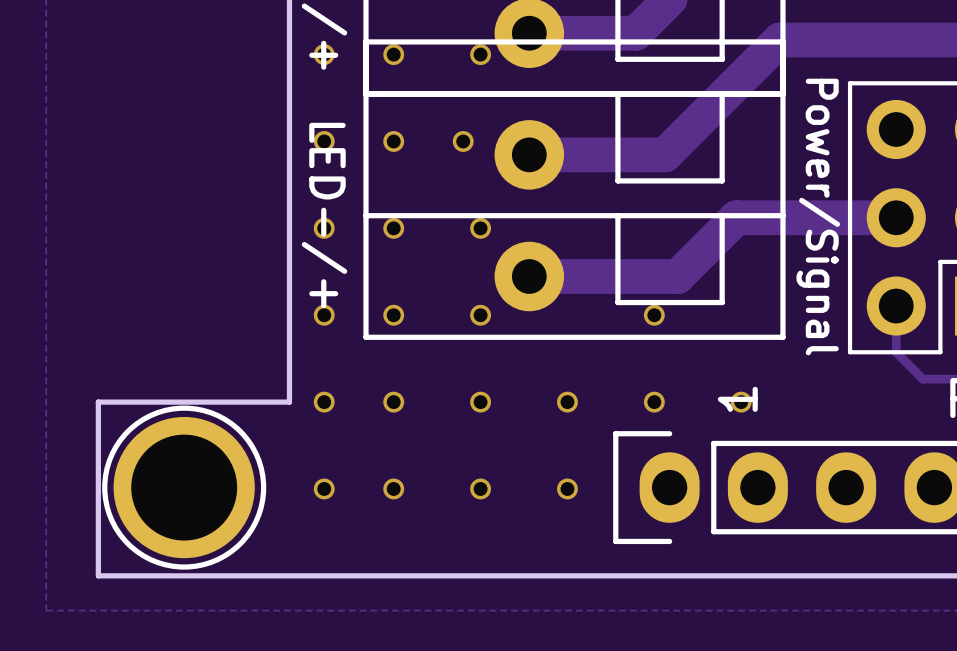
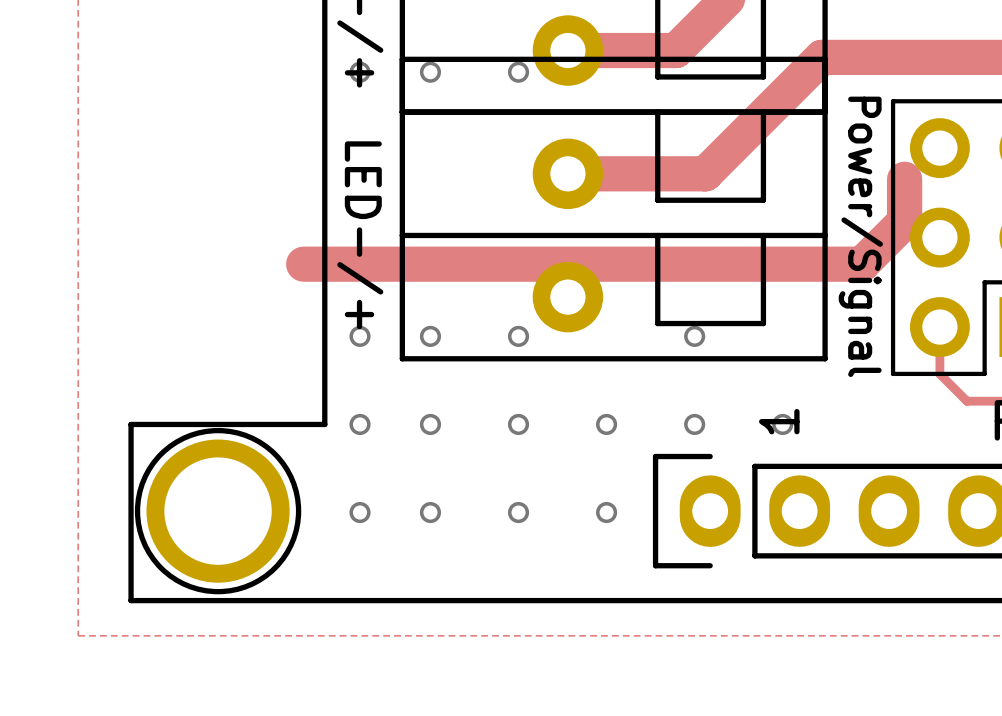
via: (324, 141) -> none
via: (393, 141) -> none
via: (463, 141) -> none
track: none -> (904, 179) (904, 221) (862, 264) (303, 264)
track: (896, 217) (736, 217) (677, 276) (529, 276) -> none
via: (324, 228) -> none
via: (393, 228) -> none
via: (480, 228) -> none

